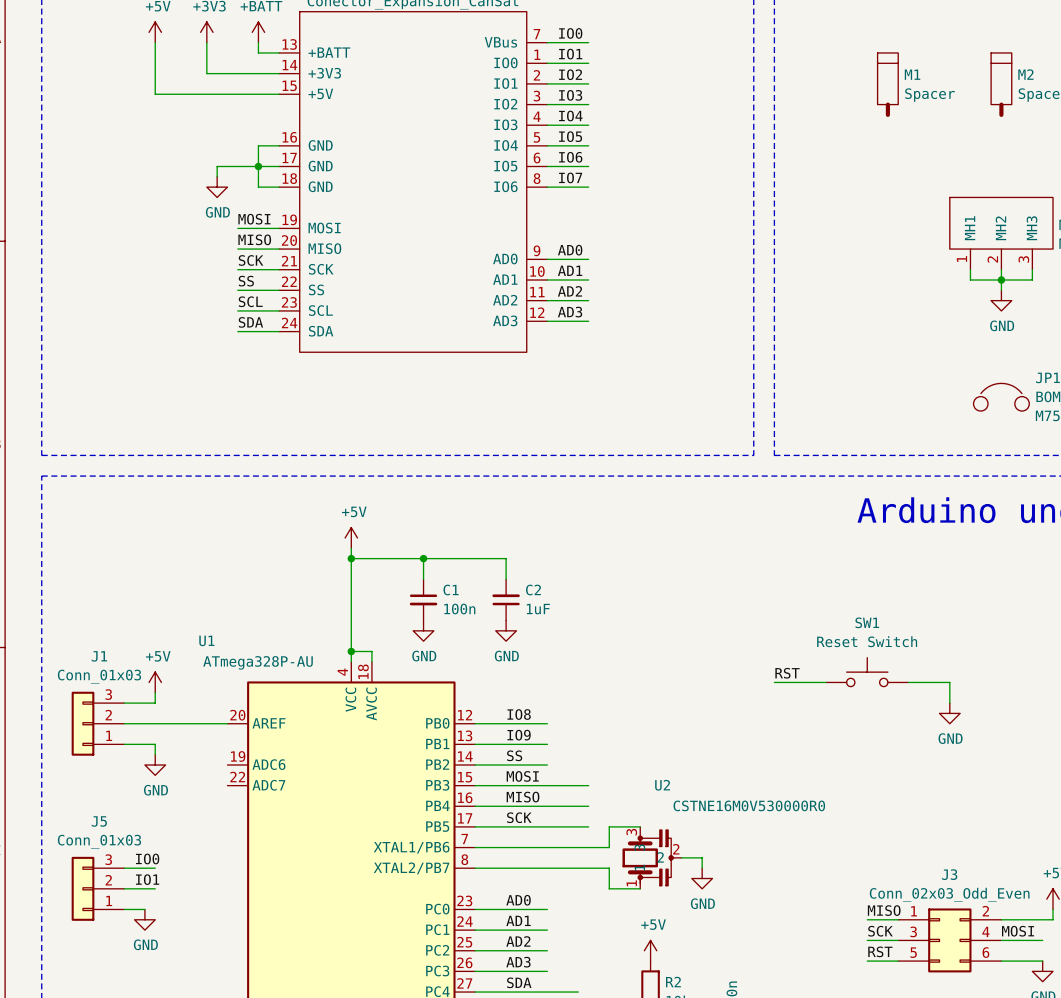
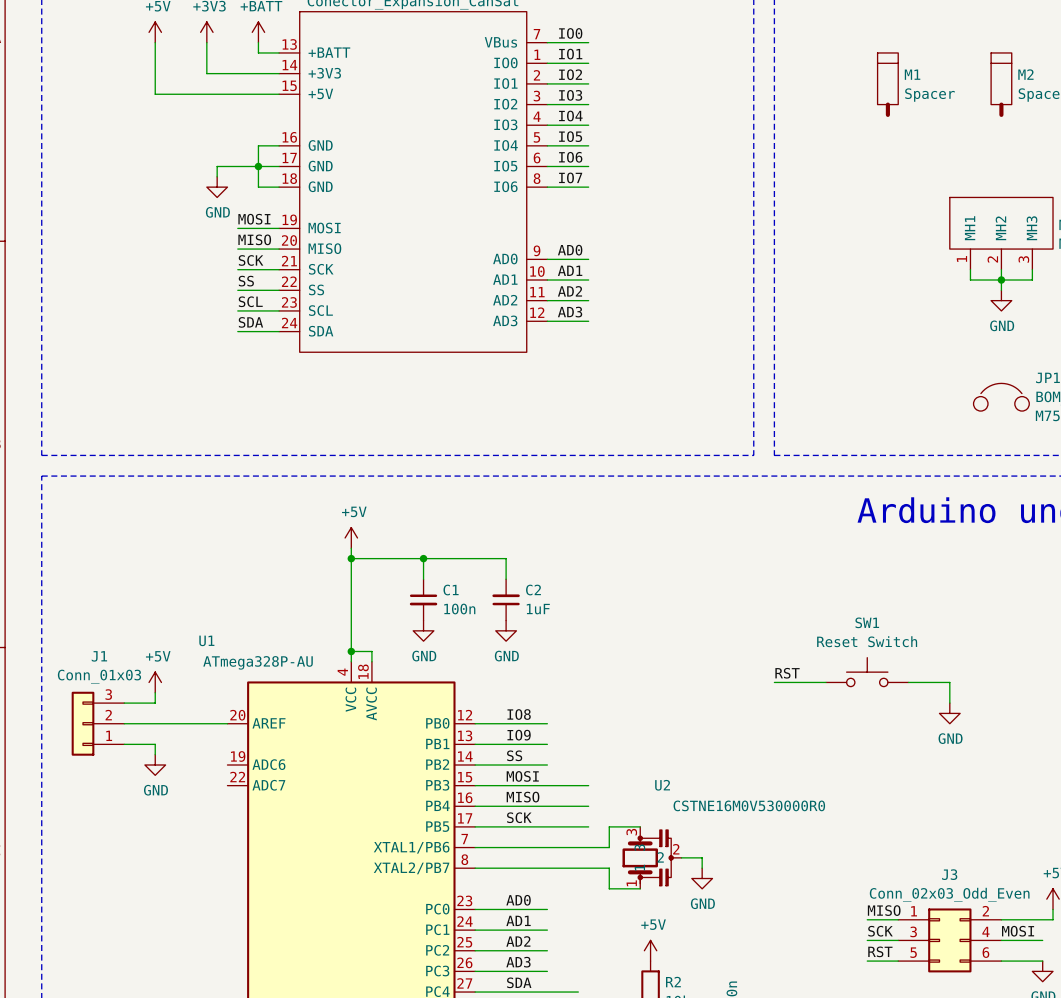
label: IO0 (147, 858) -> none
wire: (124, 868) (155, 868) -> none
label: IO1 (147, 879) -> none
J5: Conn_01x03 (97, 888) -> none
wire: (124, 888) (155, 888) -> none
wire: (124, 909) (144, 909) -> none
power symbol: GND (144, 919) -> none

